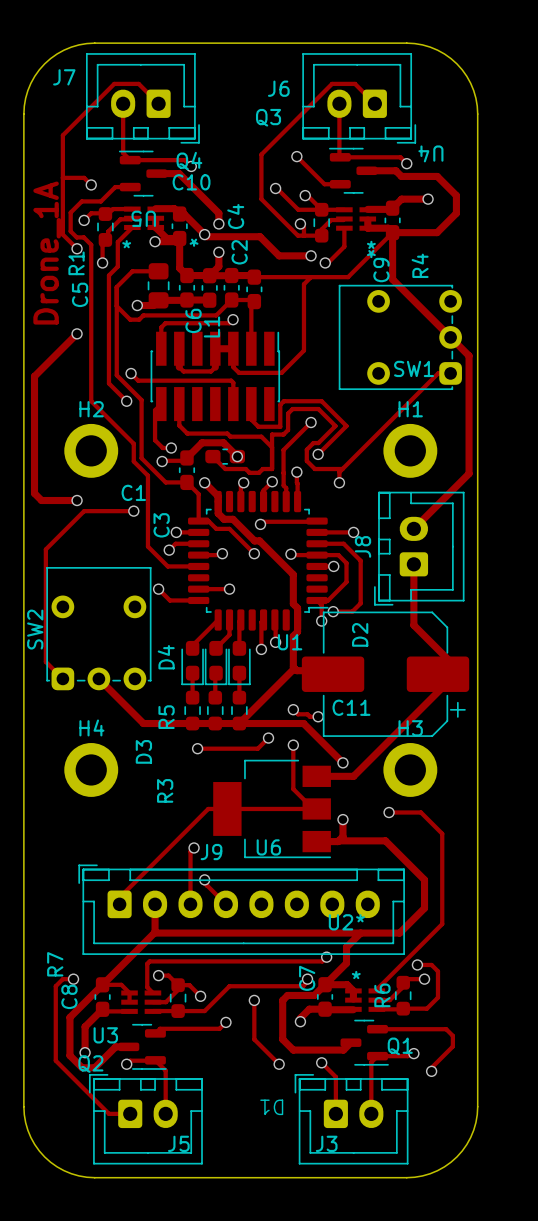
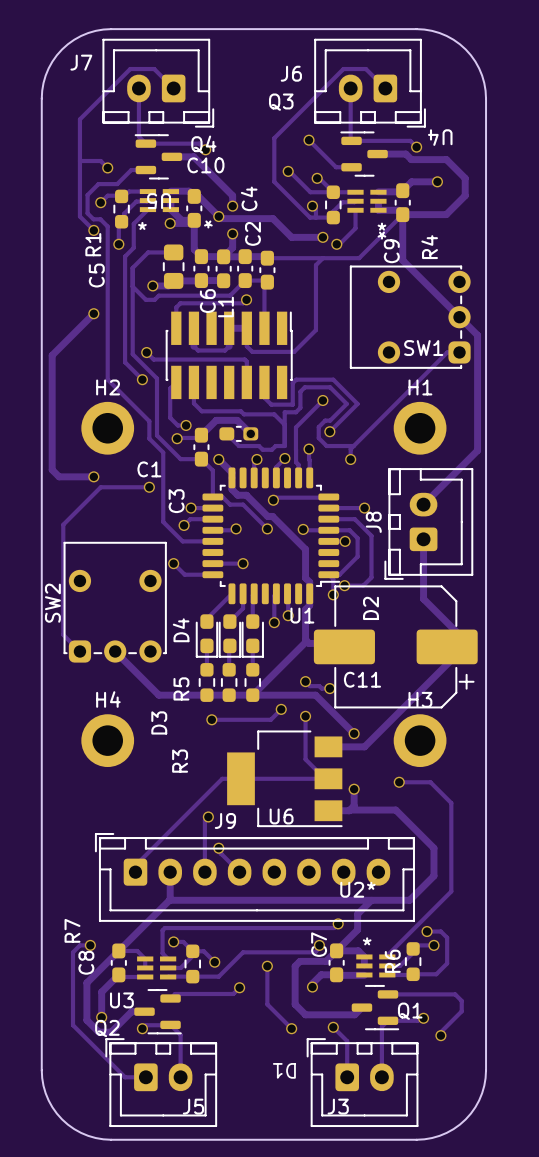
text: Drone_1A (47, 253) -> none

